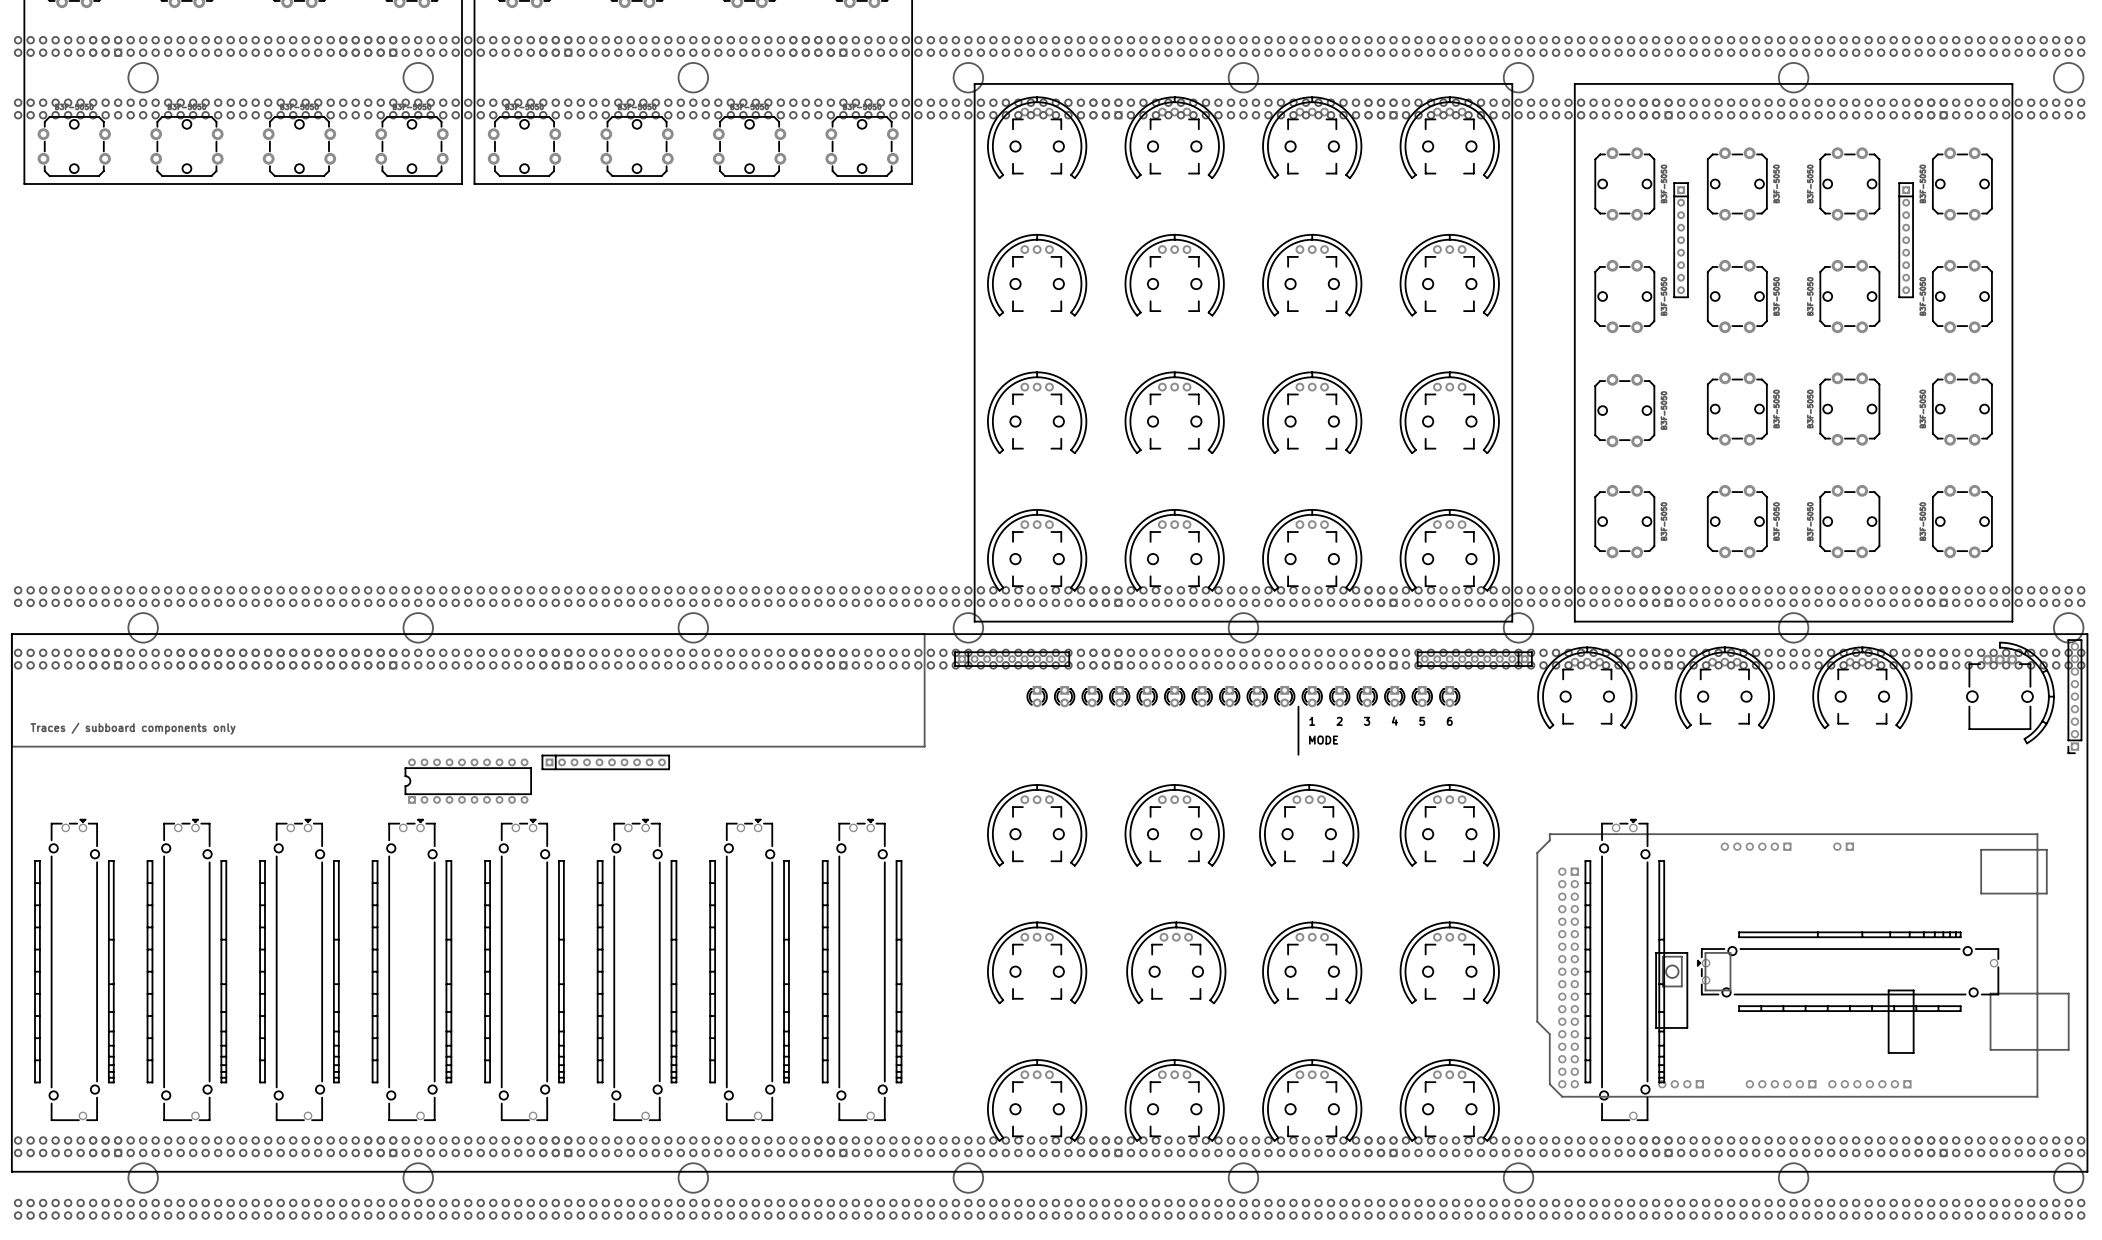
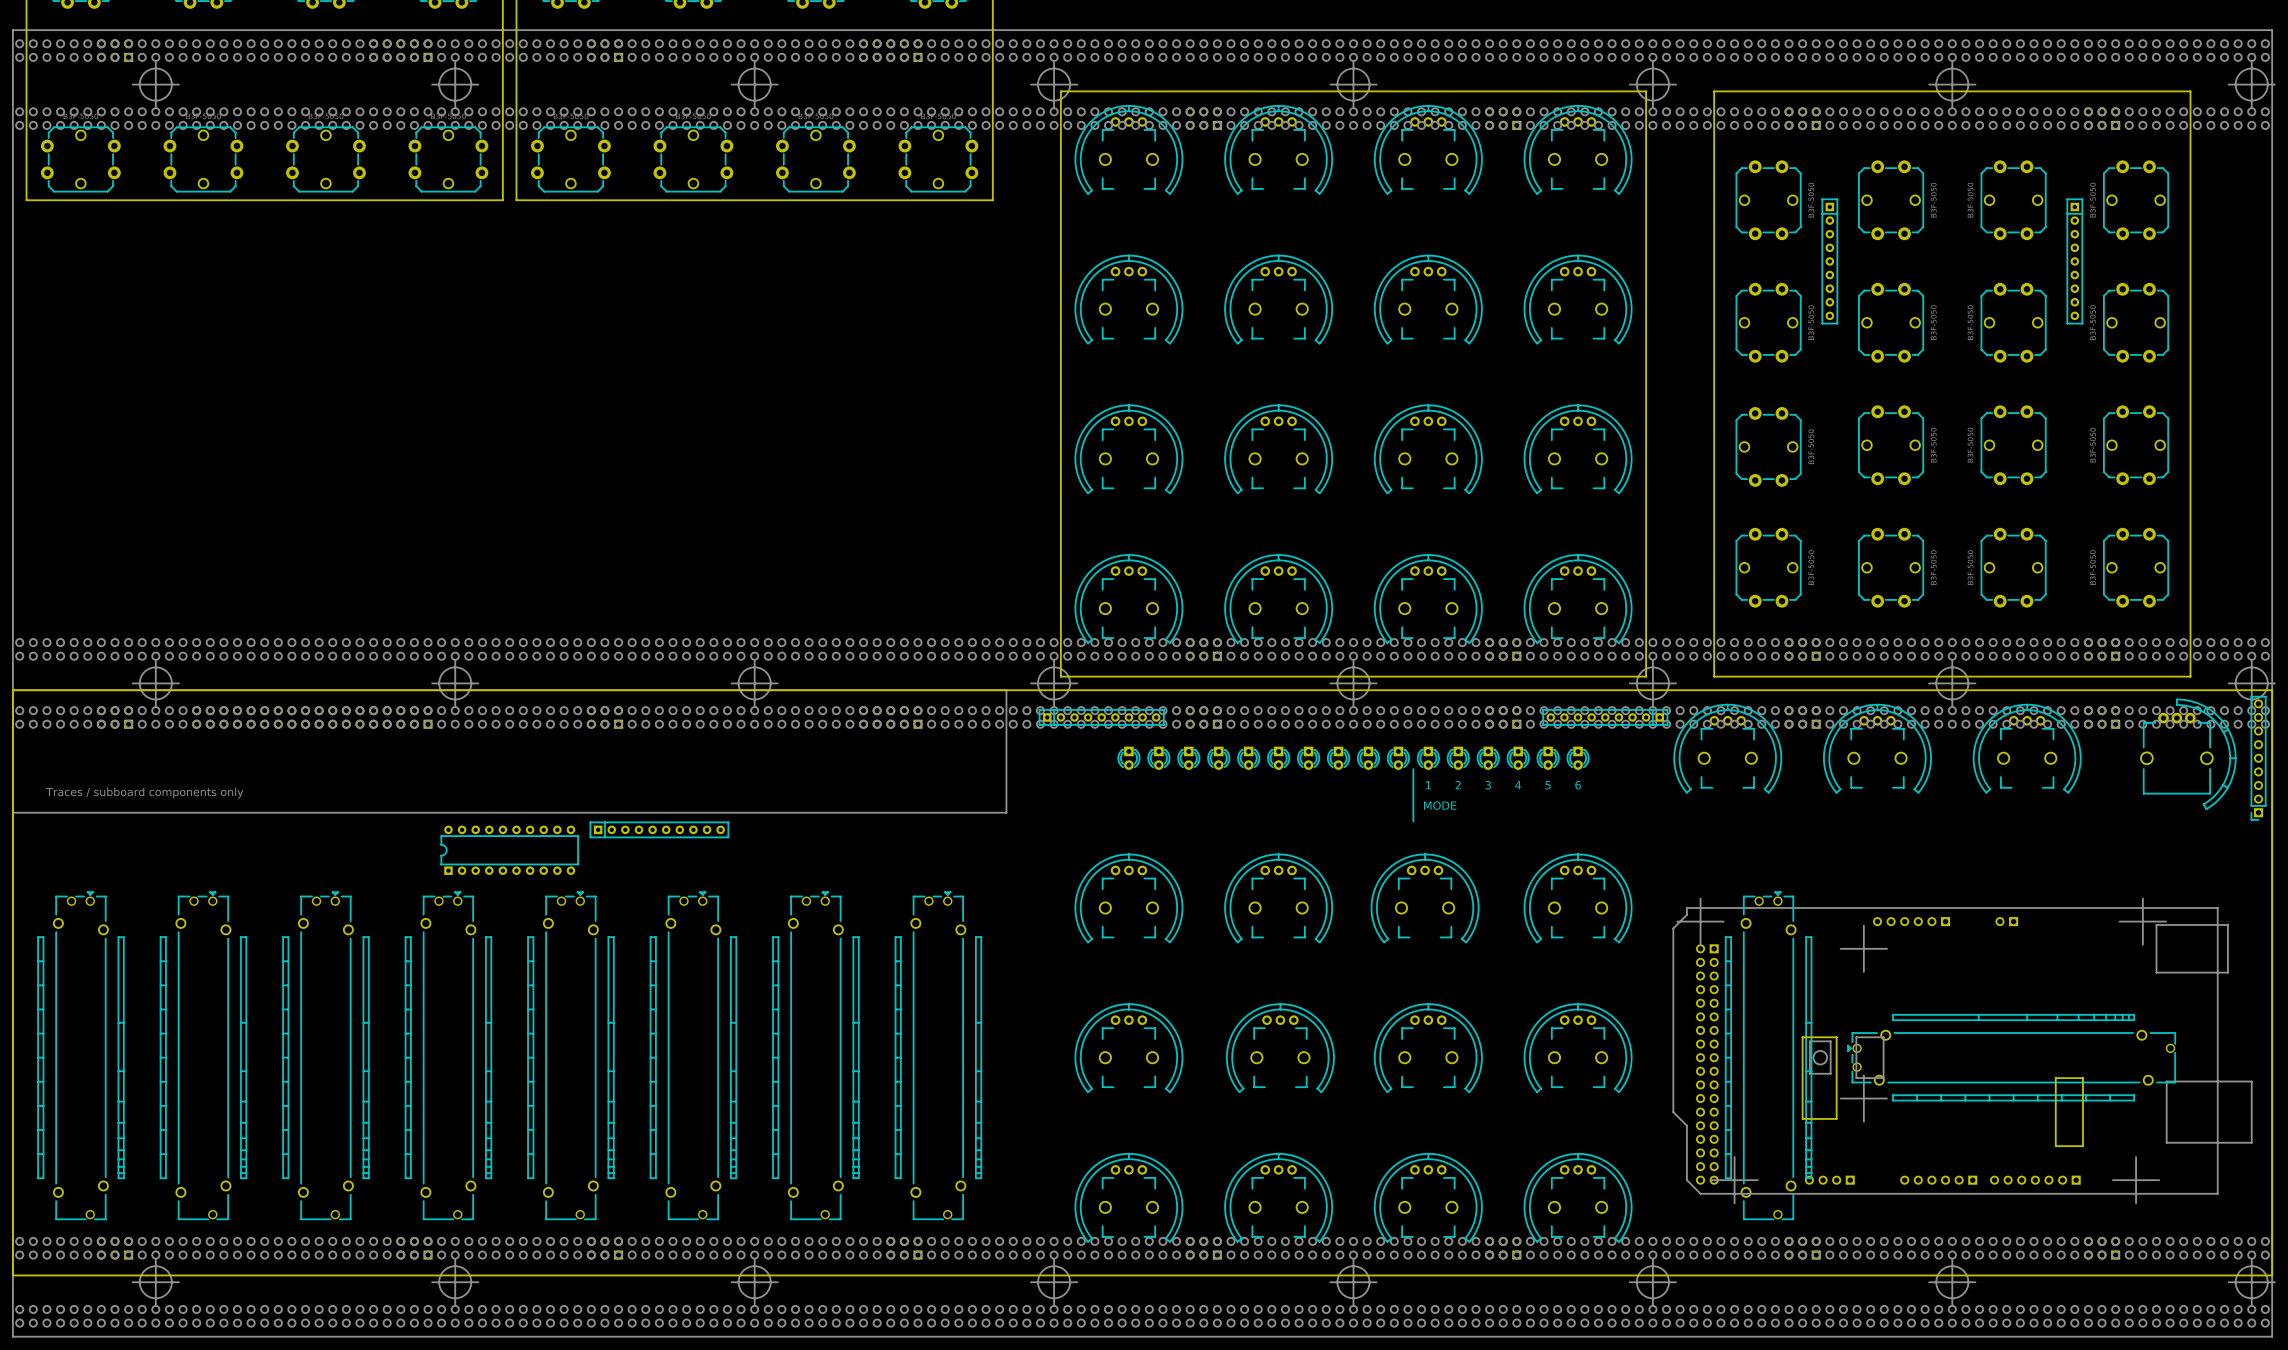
line: none -> (155, 61) (155, 107)
line: none -> (455, 61) (455, 107)
line: none -> (754, 61) (754, 107)
line: none -> (1054, 61) (1054, 107)
line: none -> (1353, 61) (1353, 107)
line: none -> (1652, 61) (1652, 107)
line: none -> (1952, 61) (1952, 107)
line: none -> (2251, 61) (2251, 107)
line: none -> (132, 84) (178, 84)
line: none -> (432, 84) (478, 84)
line: none -> (731, 84) (777, 84)
line: none -> (1030, 84) (1077, 84)
line: none -> (1330, 84) (1376, 84)
line: none -> (1629, 84) (1676, 84)
line: none -> (1929, 84) (1975, 84)
line: none -> (2228, 84) (2274, 84)
line: none -> (155, 660) (155, 706)
line: none -> (455, 660) (455, 706)
line: none -> (754, 660) (754, 706)
line: none -> (1054, 660) (1054, 706)
line: none -> (1353, 660) (1353, 706)
line: none -> (1652, 660) (1652, 706)
line: none -> (1952, 660) (1952, 706)
line: none -> (2251, 660) (2251, 706)
line: none -> (132, 683) (178, 683)
line: none -> (432, 683) (478, 683)
line: none -> (731, 683) (777, 683)
line: none -> (1030, 683) (1077, 683)
line: none -> (1330, 683) (1376, 683)
line: none -> (1629, 683) (1676, 683)
line: none -> (1929, 683) (1975, 683)
line: none -> (2228, 683) (2274, 683)
line: none -> (12, 690) (12, 30) (2272, 30) (2272, 1336) (12, 1336) (12, 812)
line: none -> (1700, 898) (1700, 944)
line: none -> (2142, 898) (2142, 944)
line: none -> (1677, 921) (1723, 921)
line: none -> (2119, 921) (2166, 921)
line: none -> (1863, 925) (1863, 971)
line: none -> (1840, 948) (1887, 948)
line: none -> (1863, 1075) (1863, 1121)
line: none -> (1840, 1098) (1887, 1098)
line: none -> (1734, 1157) (1734, 1203)
line: none -> (2136, 1157) (2136, 1203)
line: none -> (1711, 1180) (1757, 1180)
line: none -> (2112, 1180) (2159, 1180)
line: none -> (155, 1259) (155, 1305)
line: none -> (455, 1259) (455, 1305)
line: none -> (754, 1259) (754, 1305)
line: none -> (1054, 1259) (1054, 1305)
line: none -> (1353, 1259) (1353, 1305)
line: none -> (1652, 1259) (1652, 1305)
line: none -> (1952, 1259) (1952, 1305)
line: none -> (2251, 1259) (2251, 1305)
line: none -> (132, 1282) (178, 1282)
line: none -> (432, 1282) (478, 1282)
line: none -> (731, 1282) (777, 1282)
line: none -> (1030, 1282) (1077, 1282)
line: none -> (1330, 1282) (1376, 1282)
line: none -> (1629, 1282) (1676, 1282)
line: none -> (1929, 1282) (1975, 1282)
line: none -> (2228, 1282) (2274, 1282)

